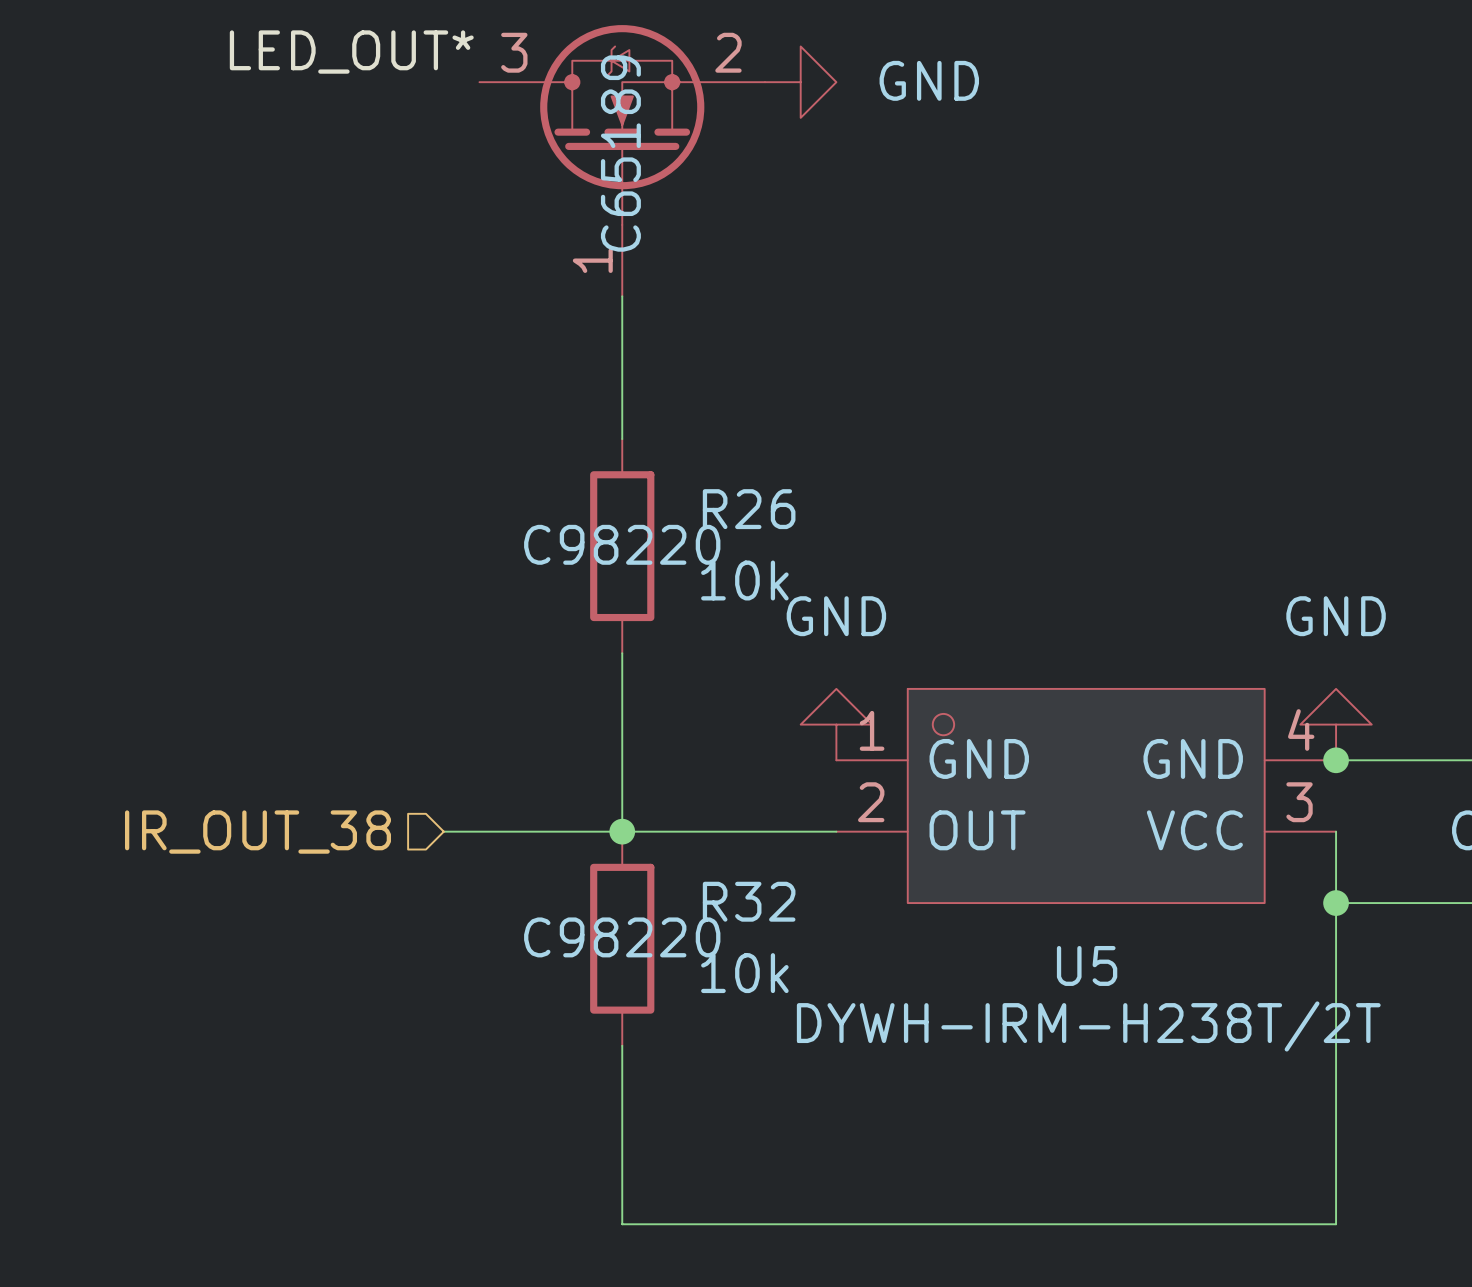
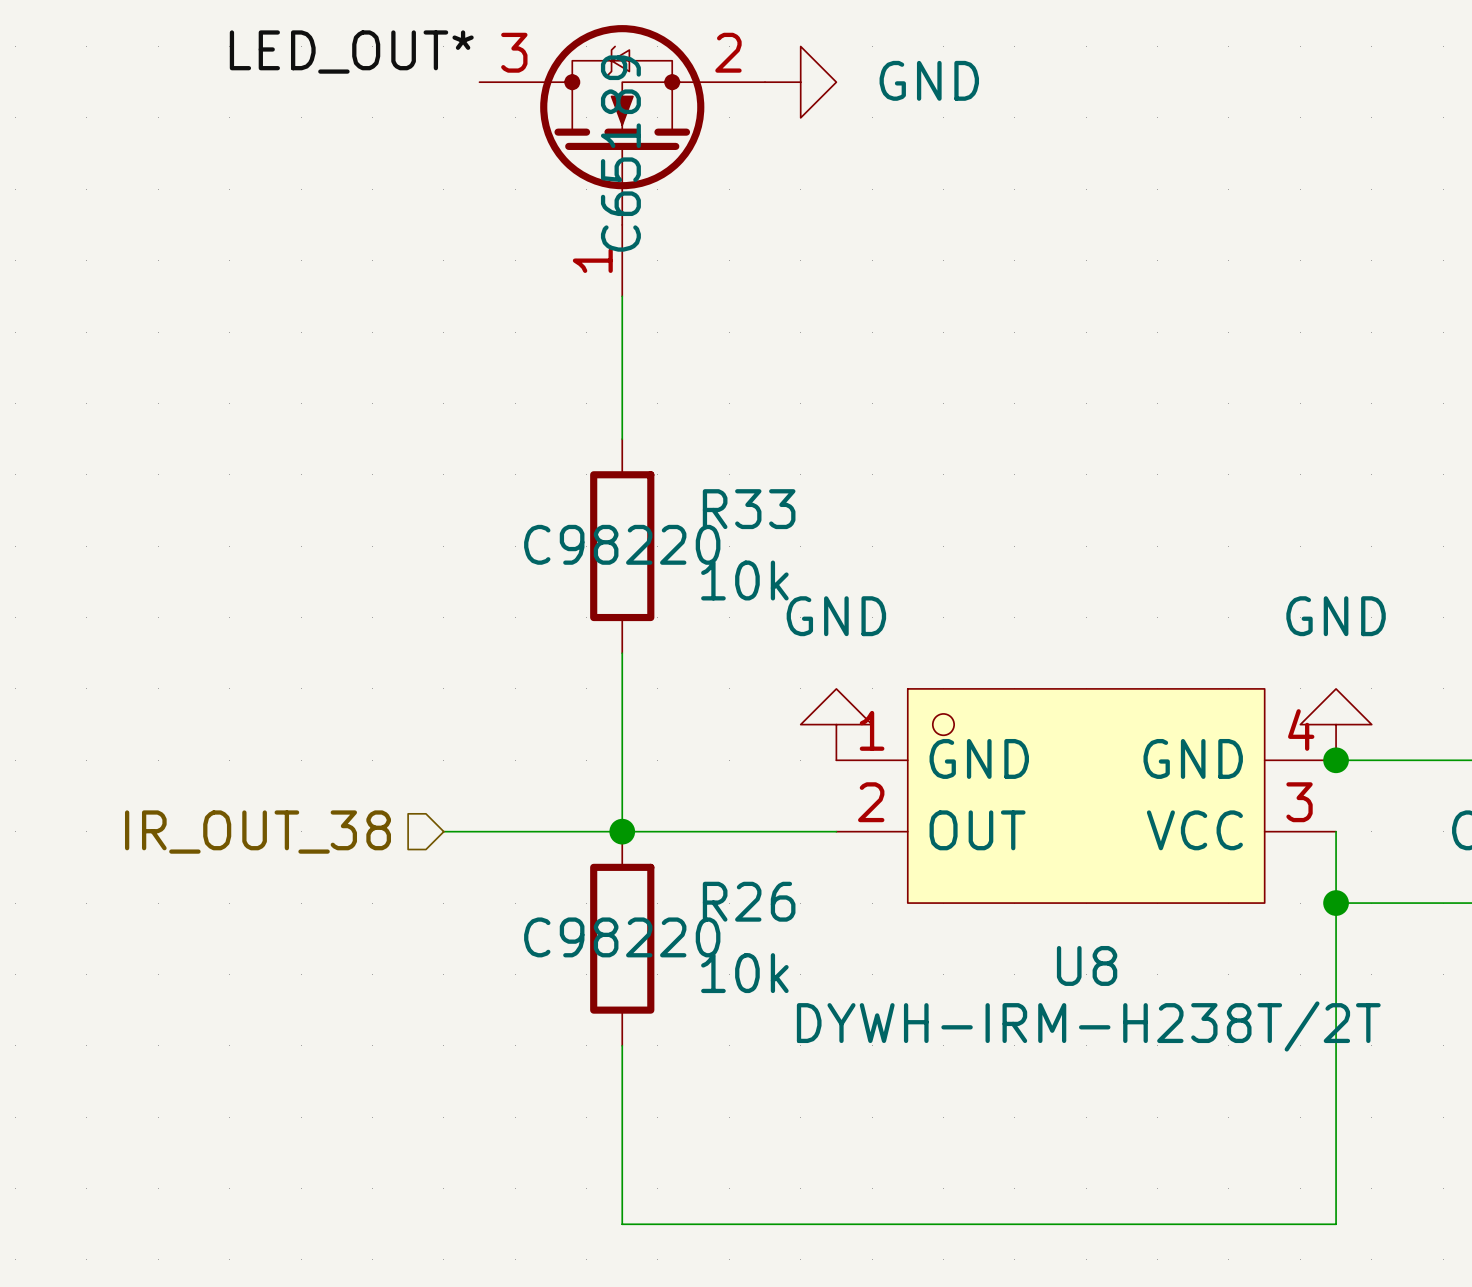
R26 name: R26 (749, 509) -> R33 (749, 509)
R32 name: R32 (749, 901) -> R26 (749, 901)
U5 name: U5 (1087, 965) -> U8 (1087, 965)

